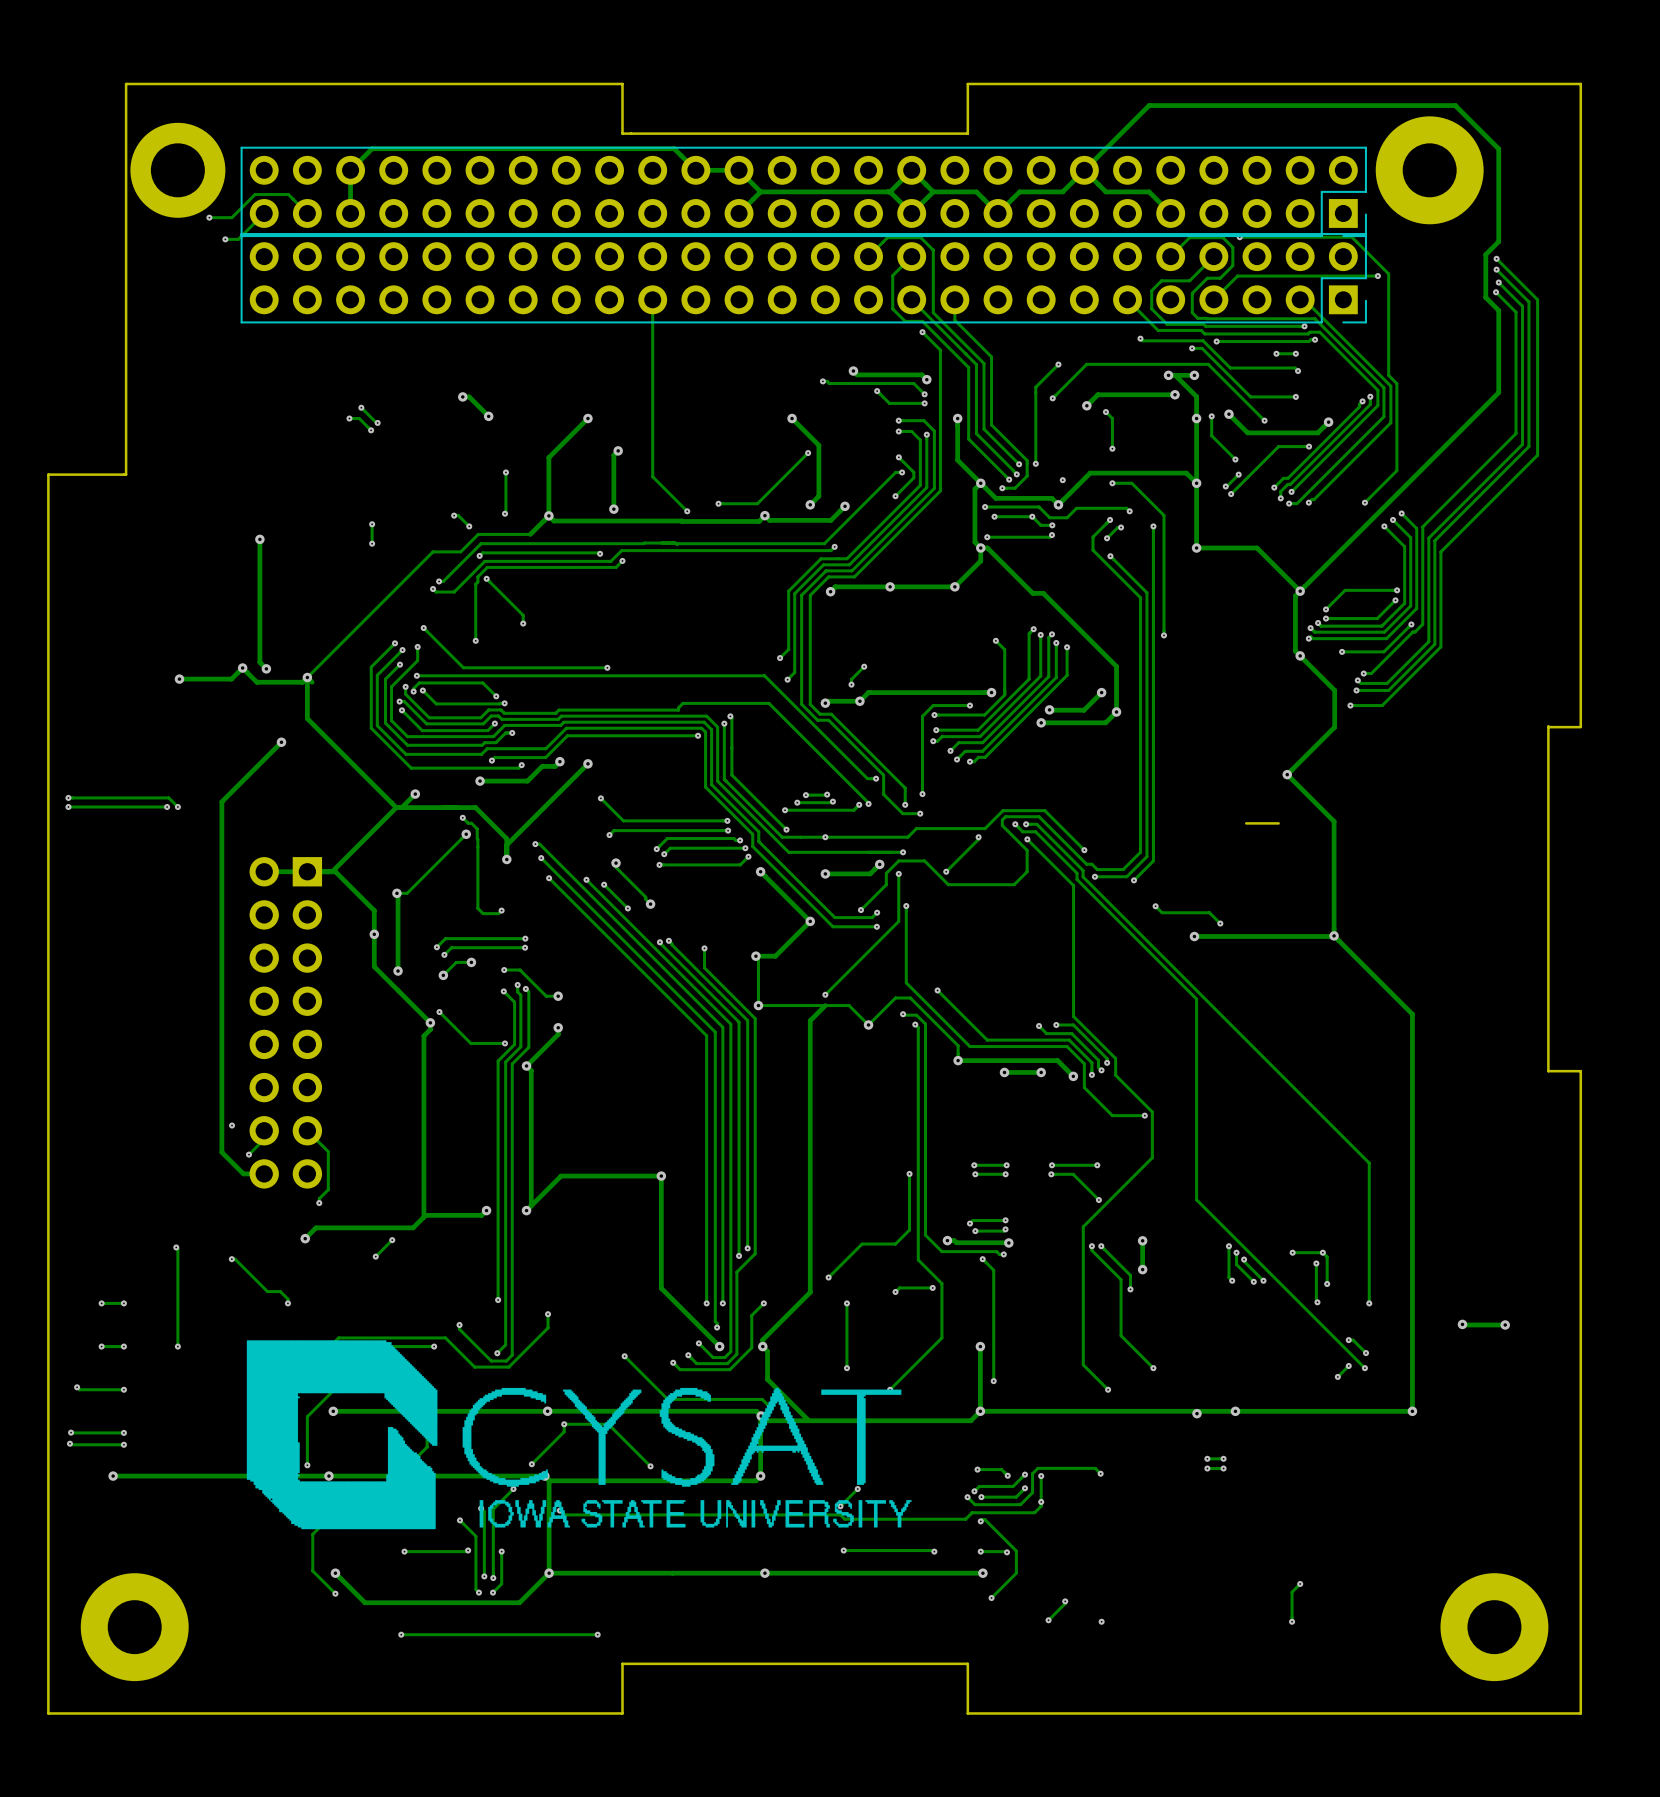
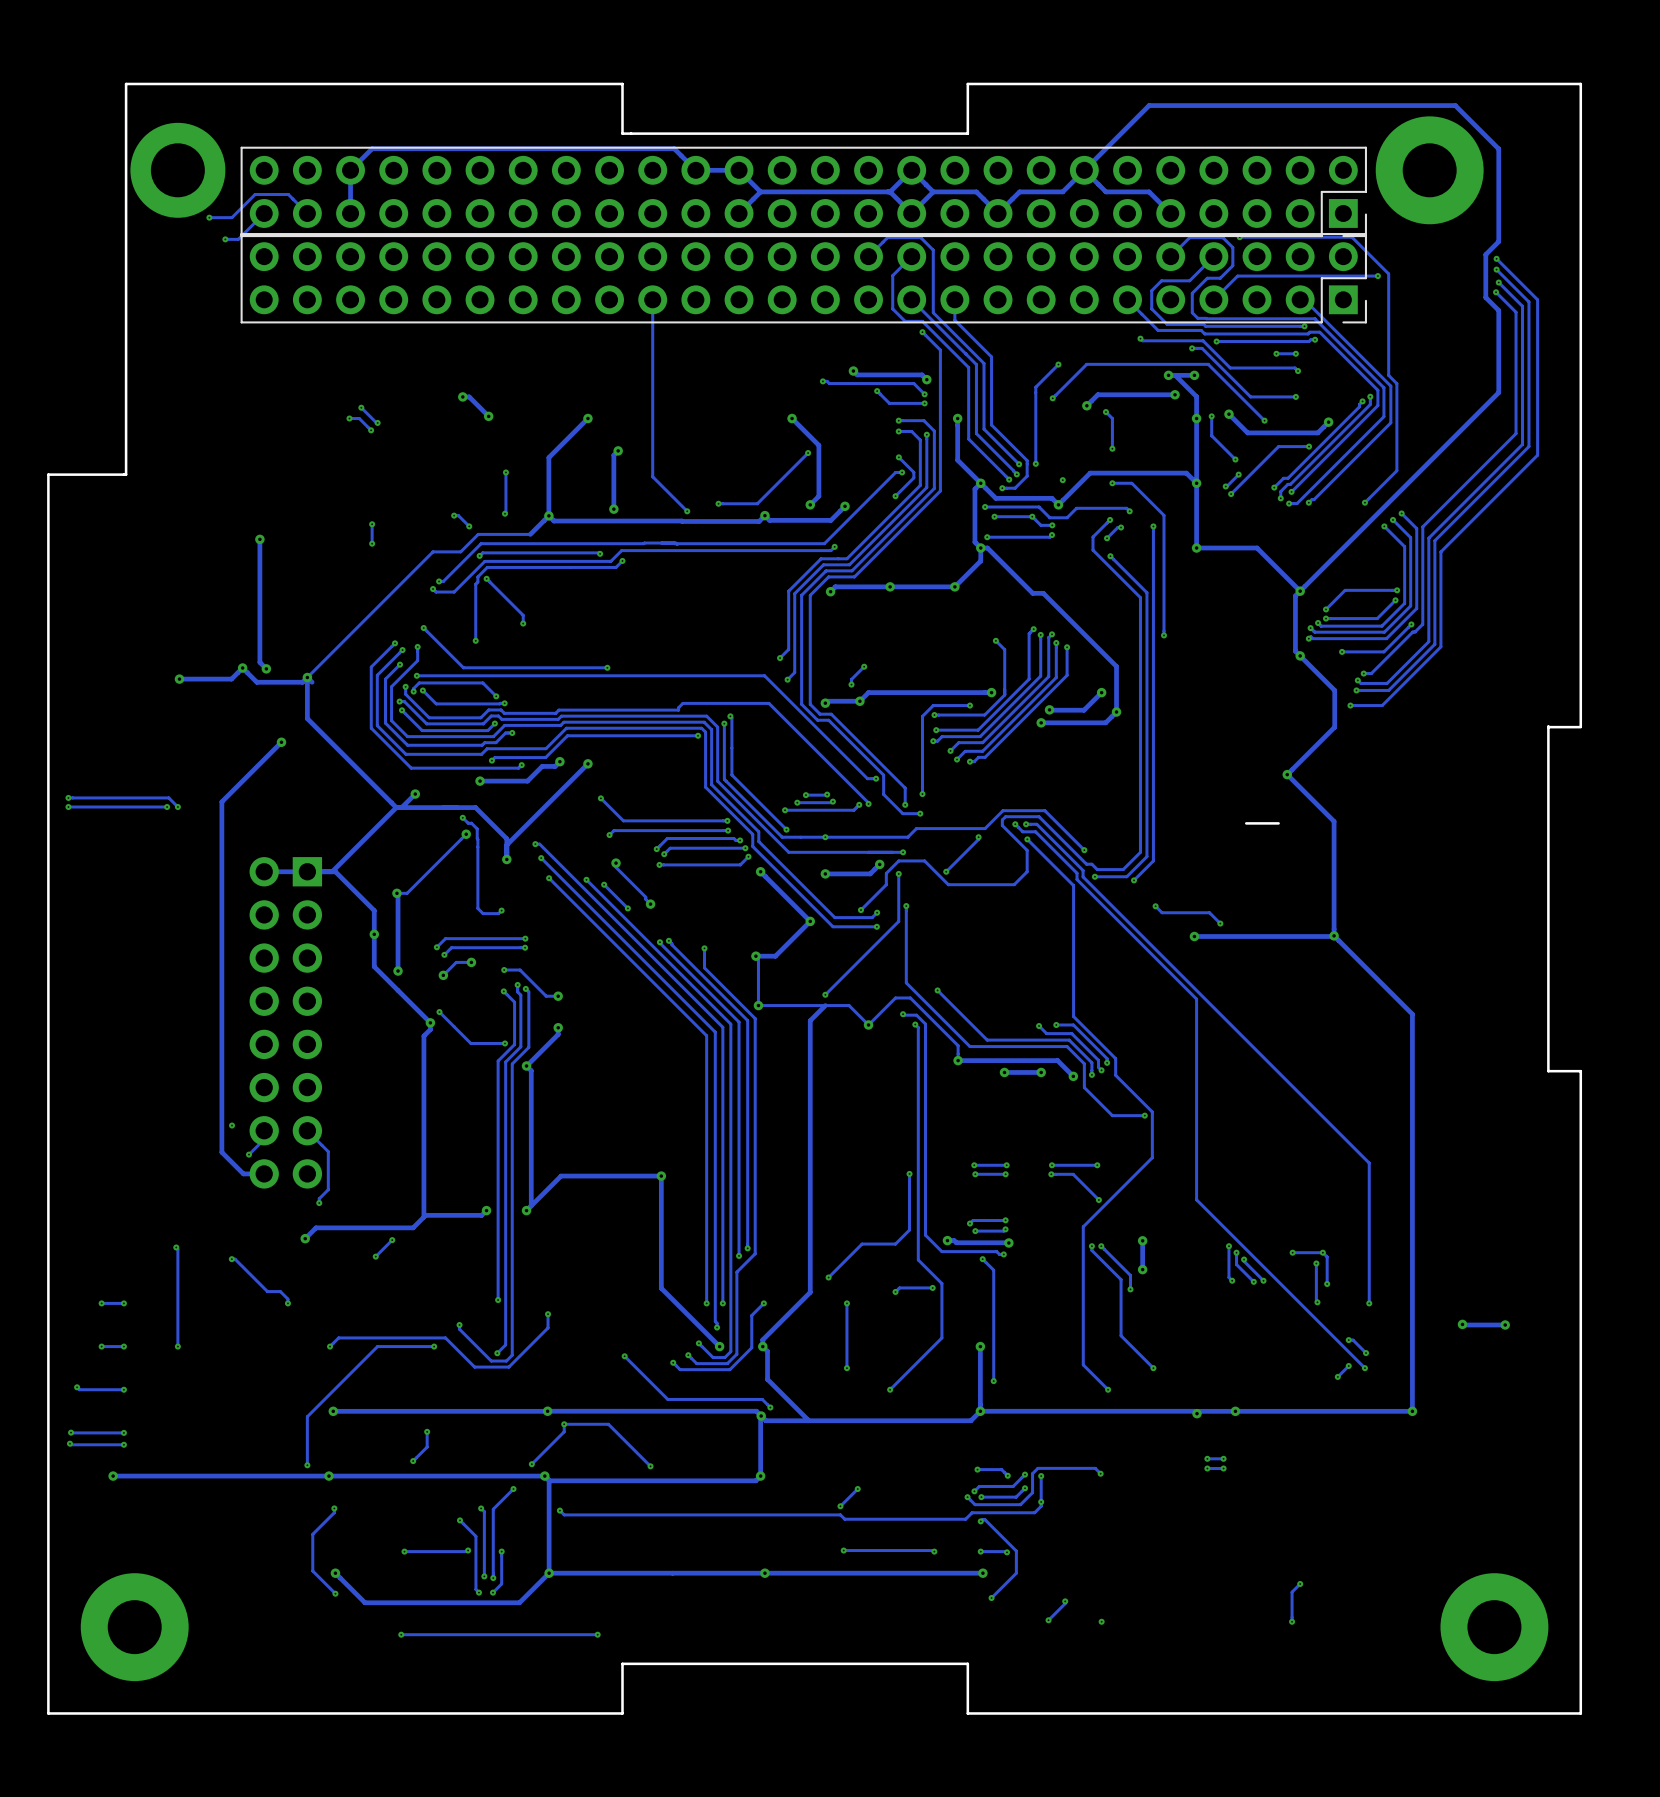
drawing: [246, 1340, 912, 1530] -> none

